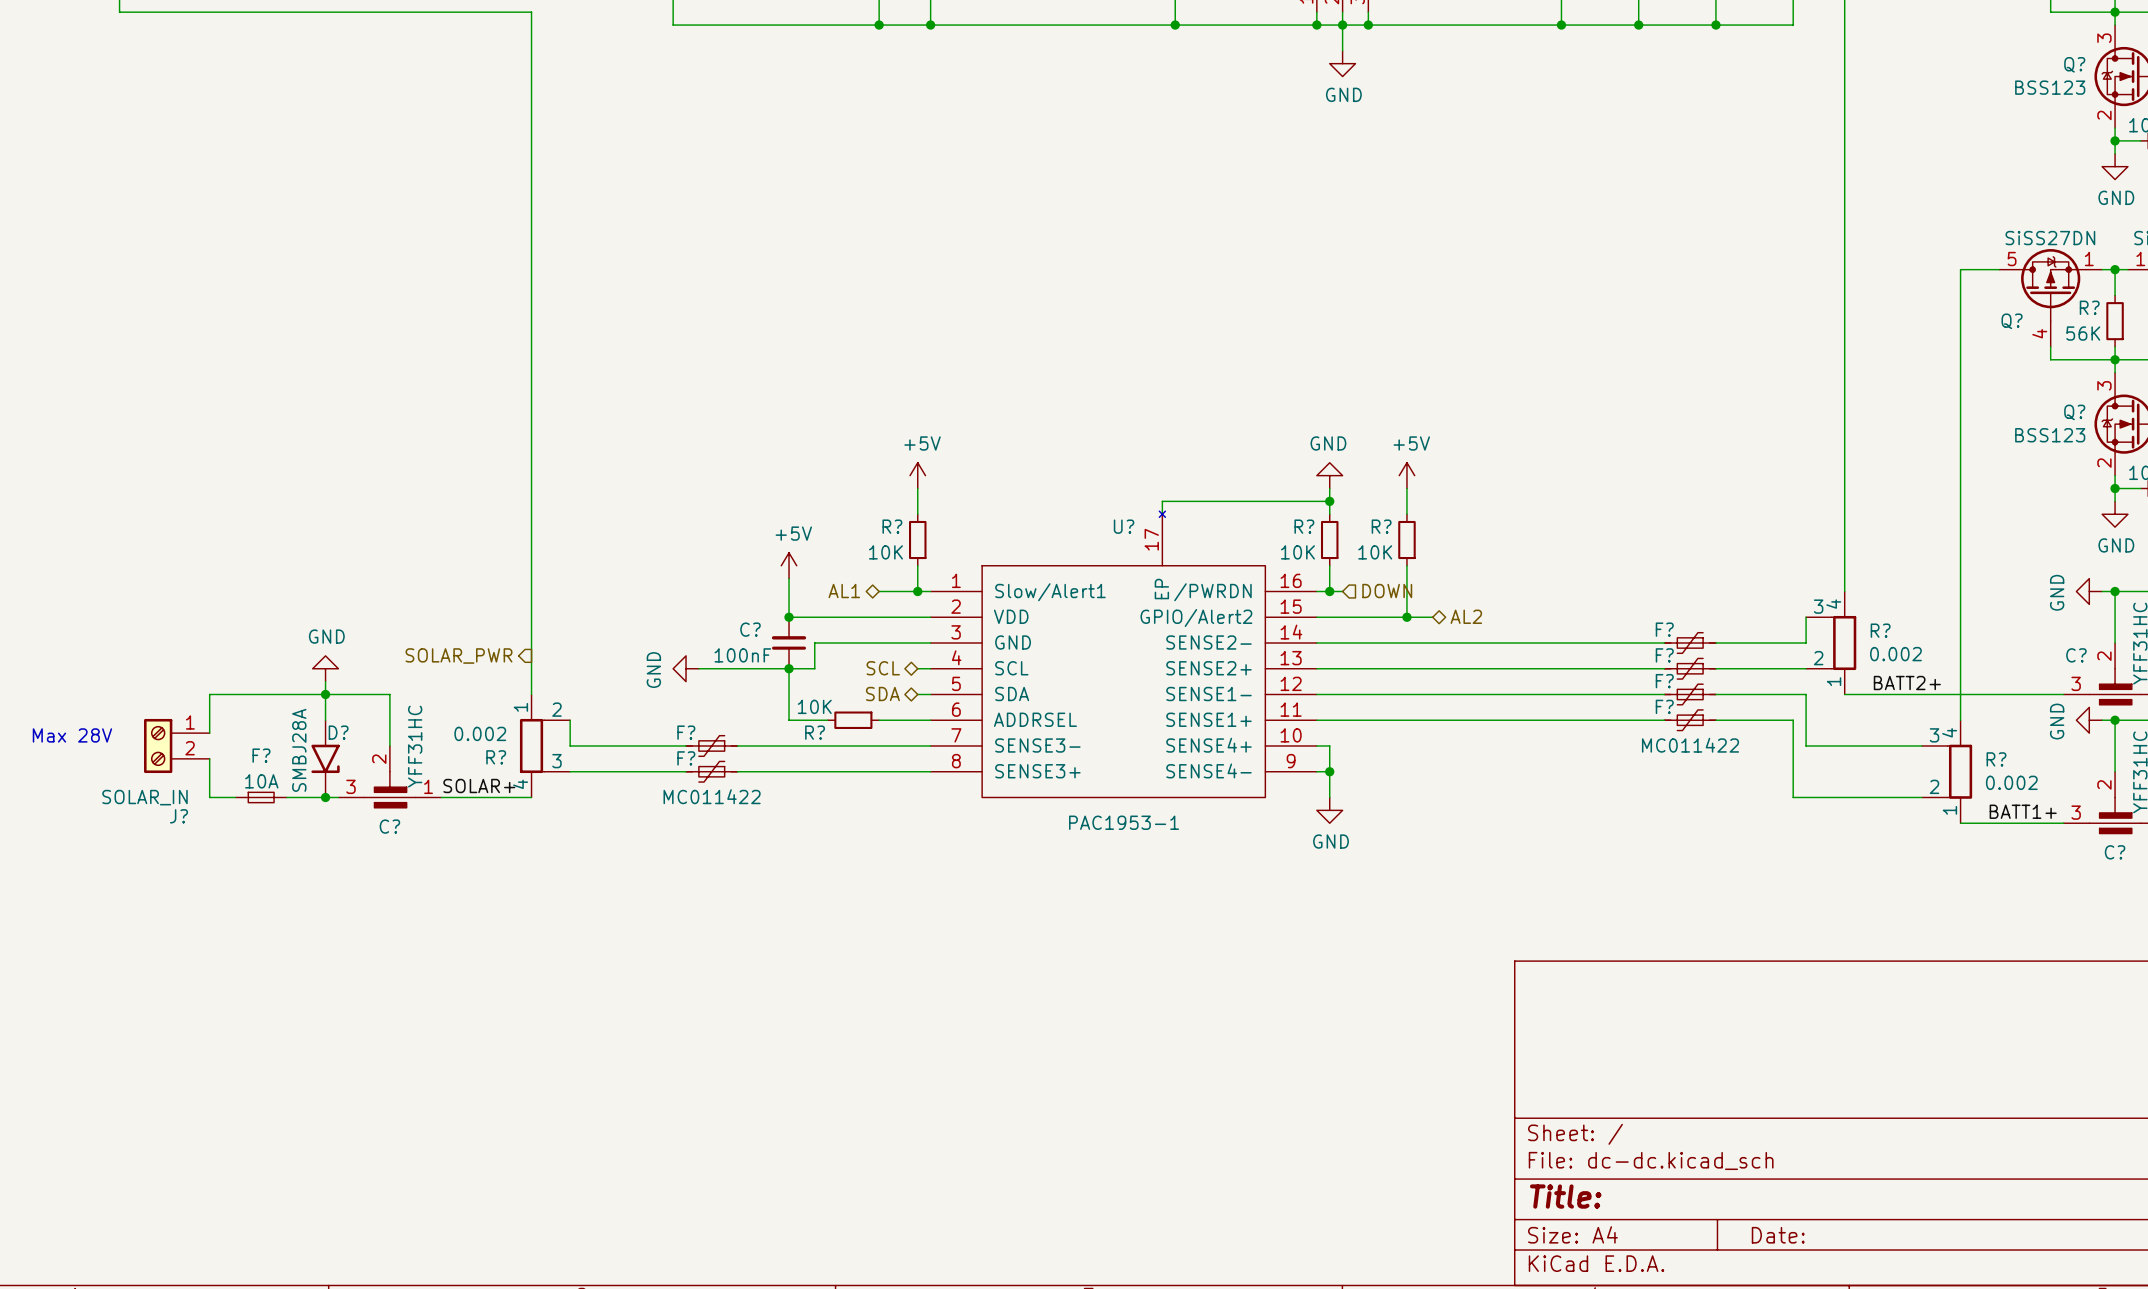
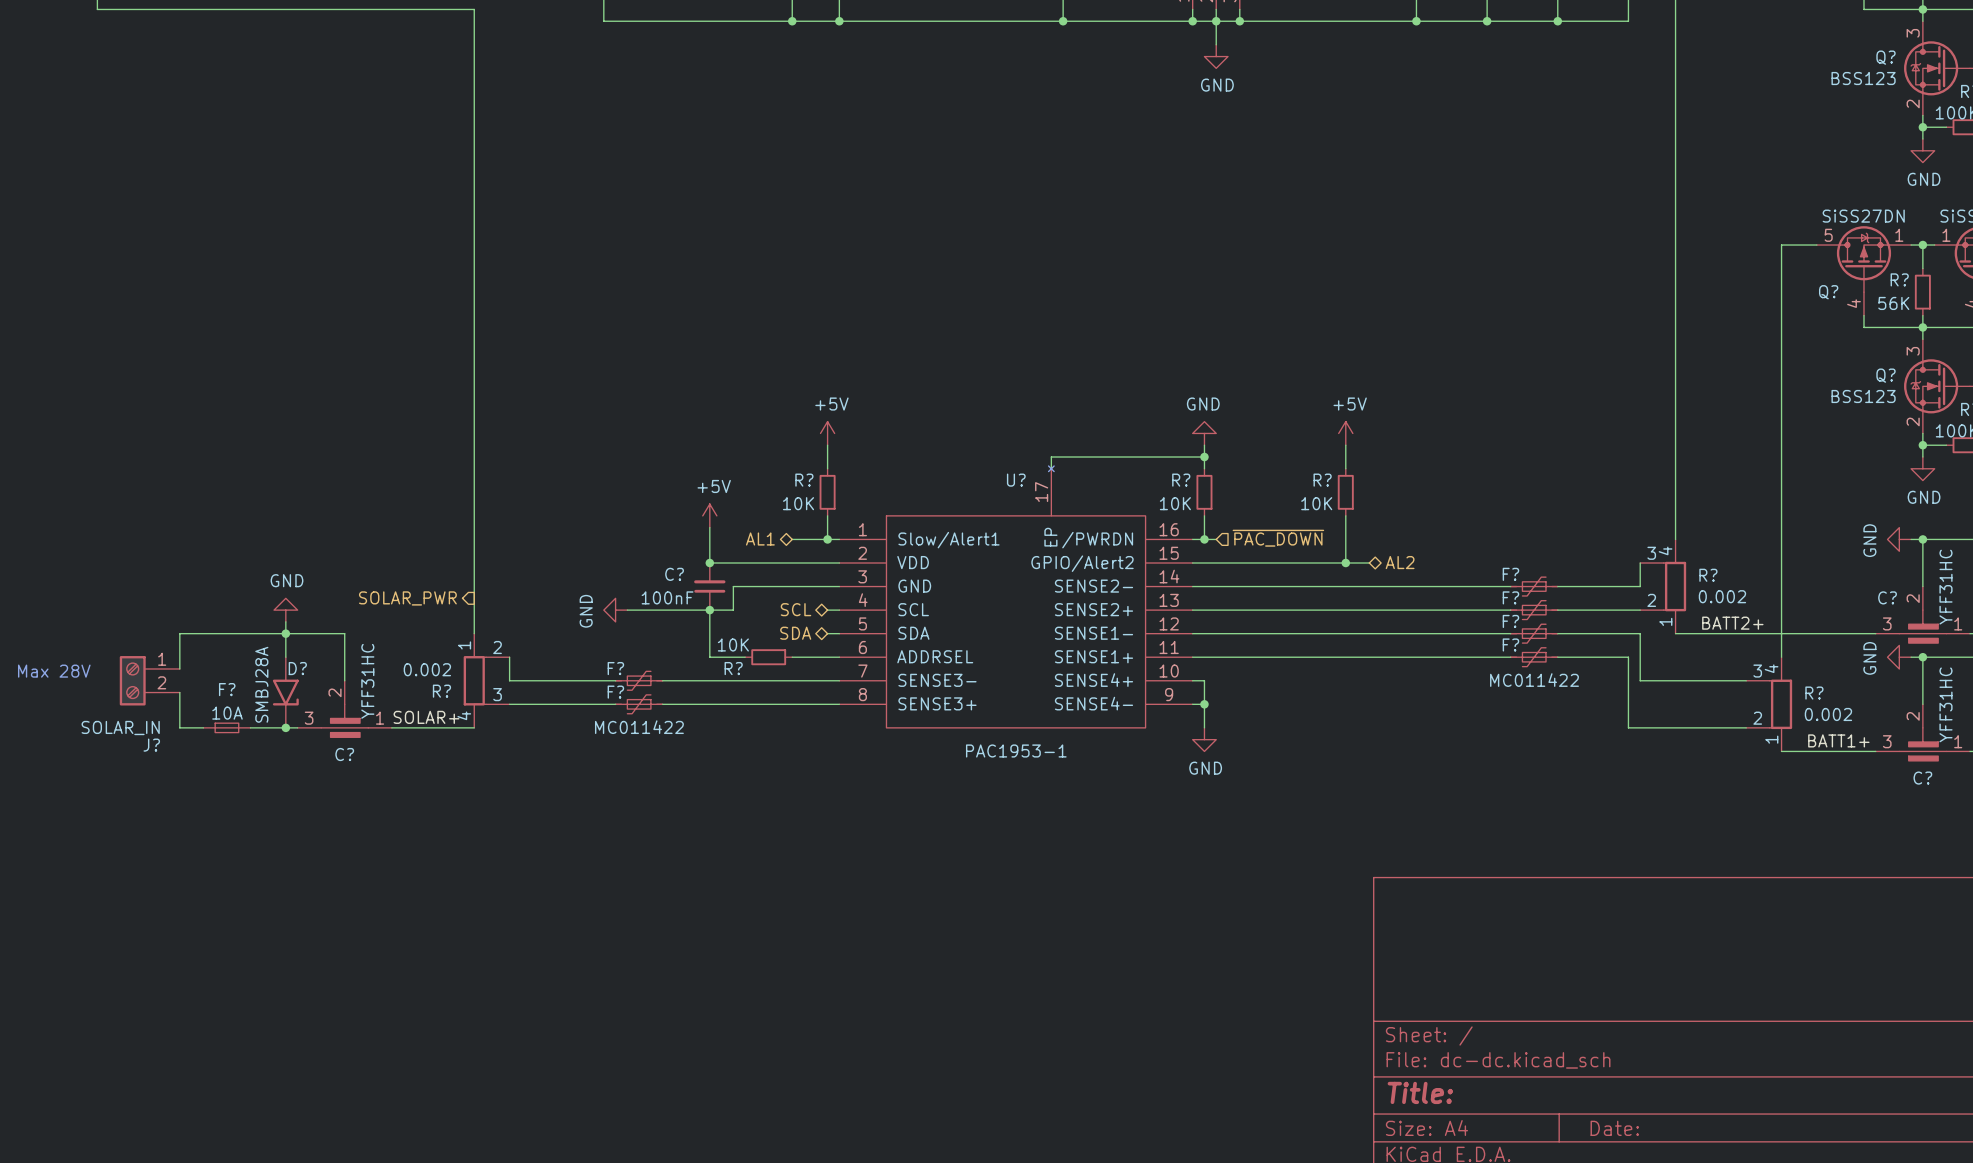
power symbol position: +5V (1406, 475) -> +5V (1345, 433)
wire: (1406, 488) (1406, 514) -> (1345, 445) (1345, 468)
R? position: (1406, 540) -> (1345, 492)
wire: (1406, 565) (1406, 617) -> (1345, 515) (1345, 563)
hierarchical label: DOWN (1387, 591) -> ~{PAC_DOWN} (1278, 538)
hierarchical label position: AL2 (1466, 616) -> AL2 (1400, 562)
junction: (1406, 617) -> none
wire: none -> (1298, 563) (1369, 563)
junction: none -> (1345, 563)

